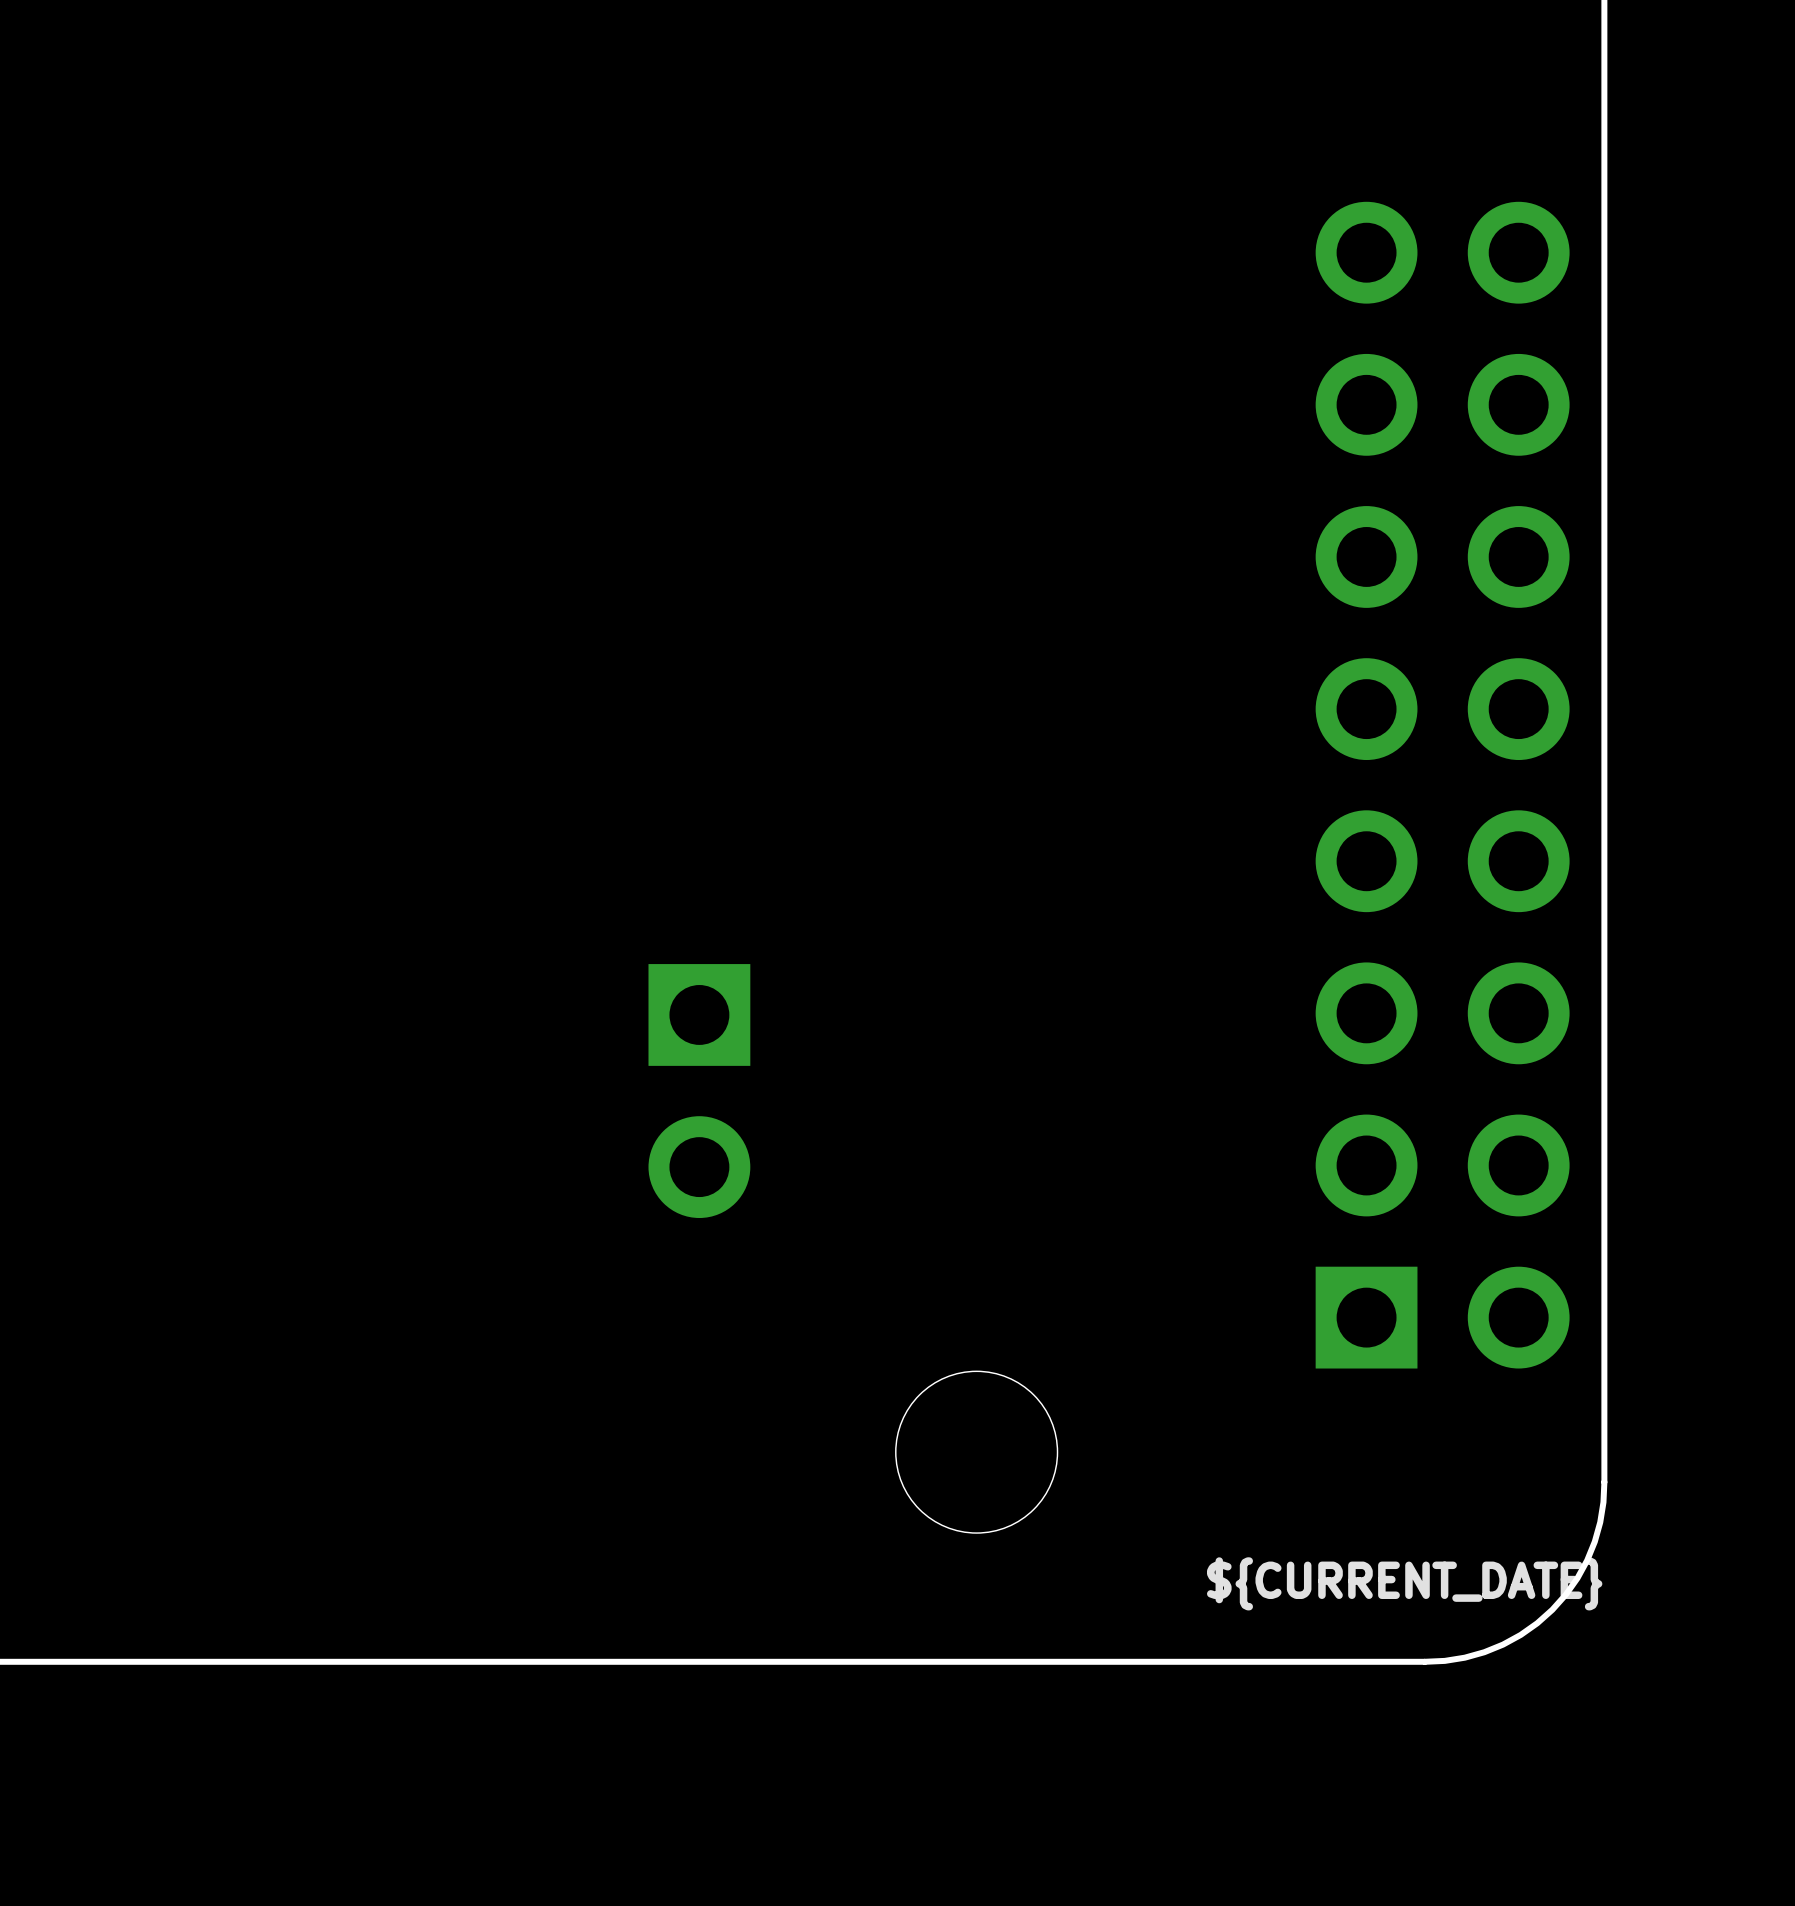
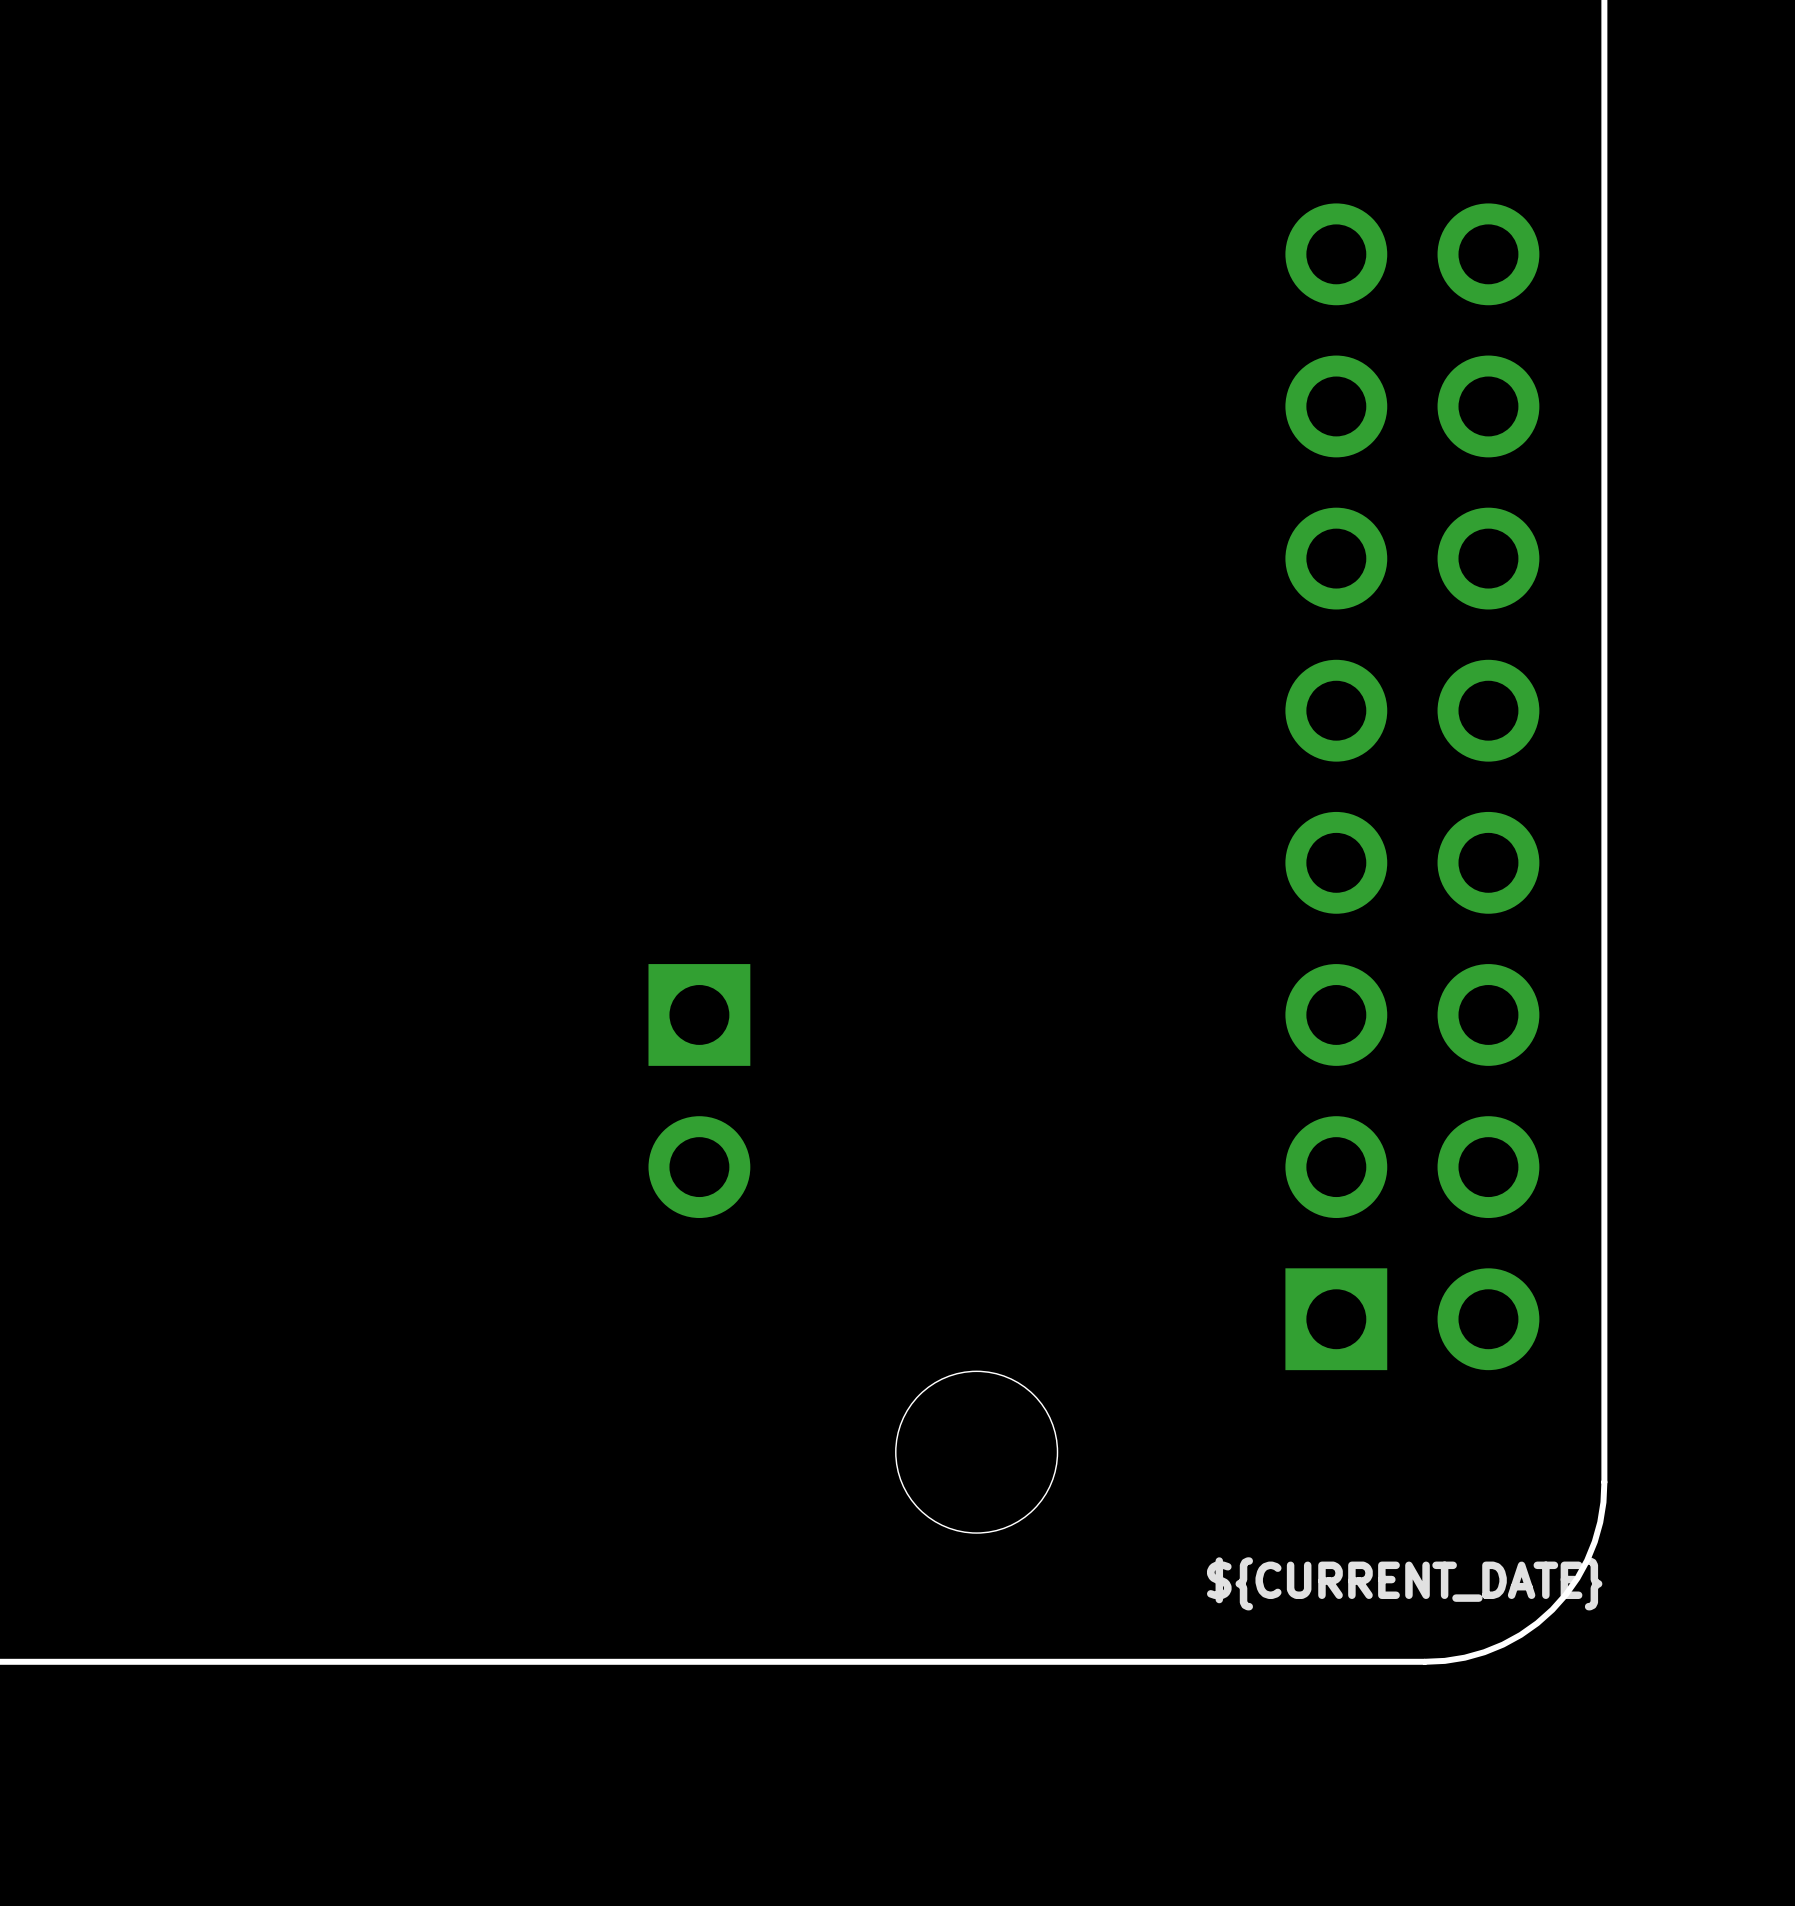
part position: (1442, 785) -> (1412, 786)

